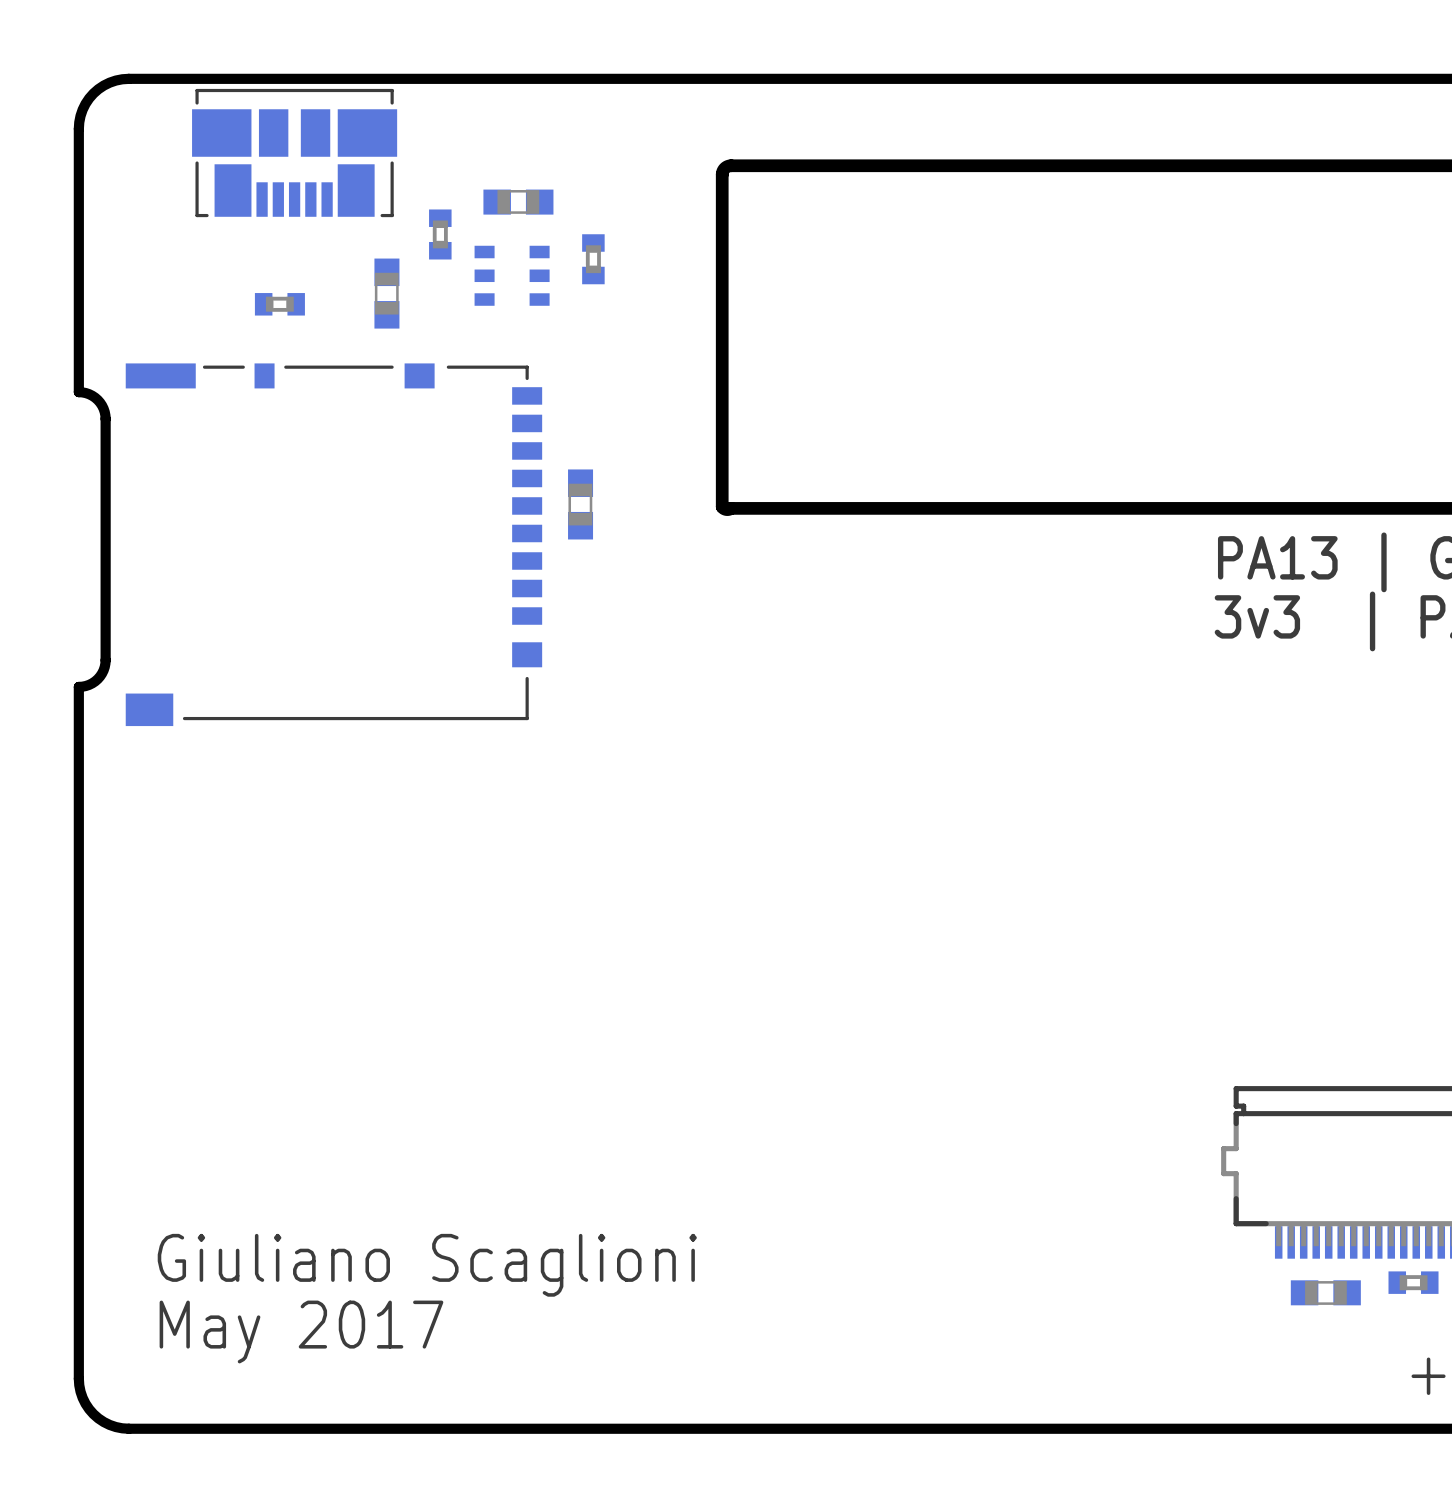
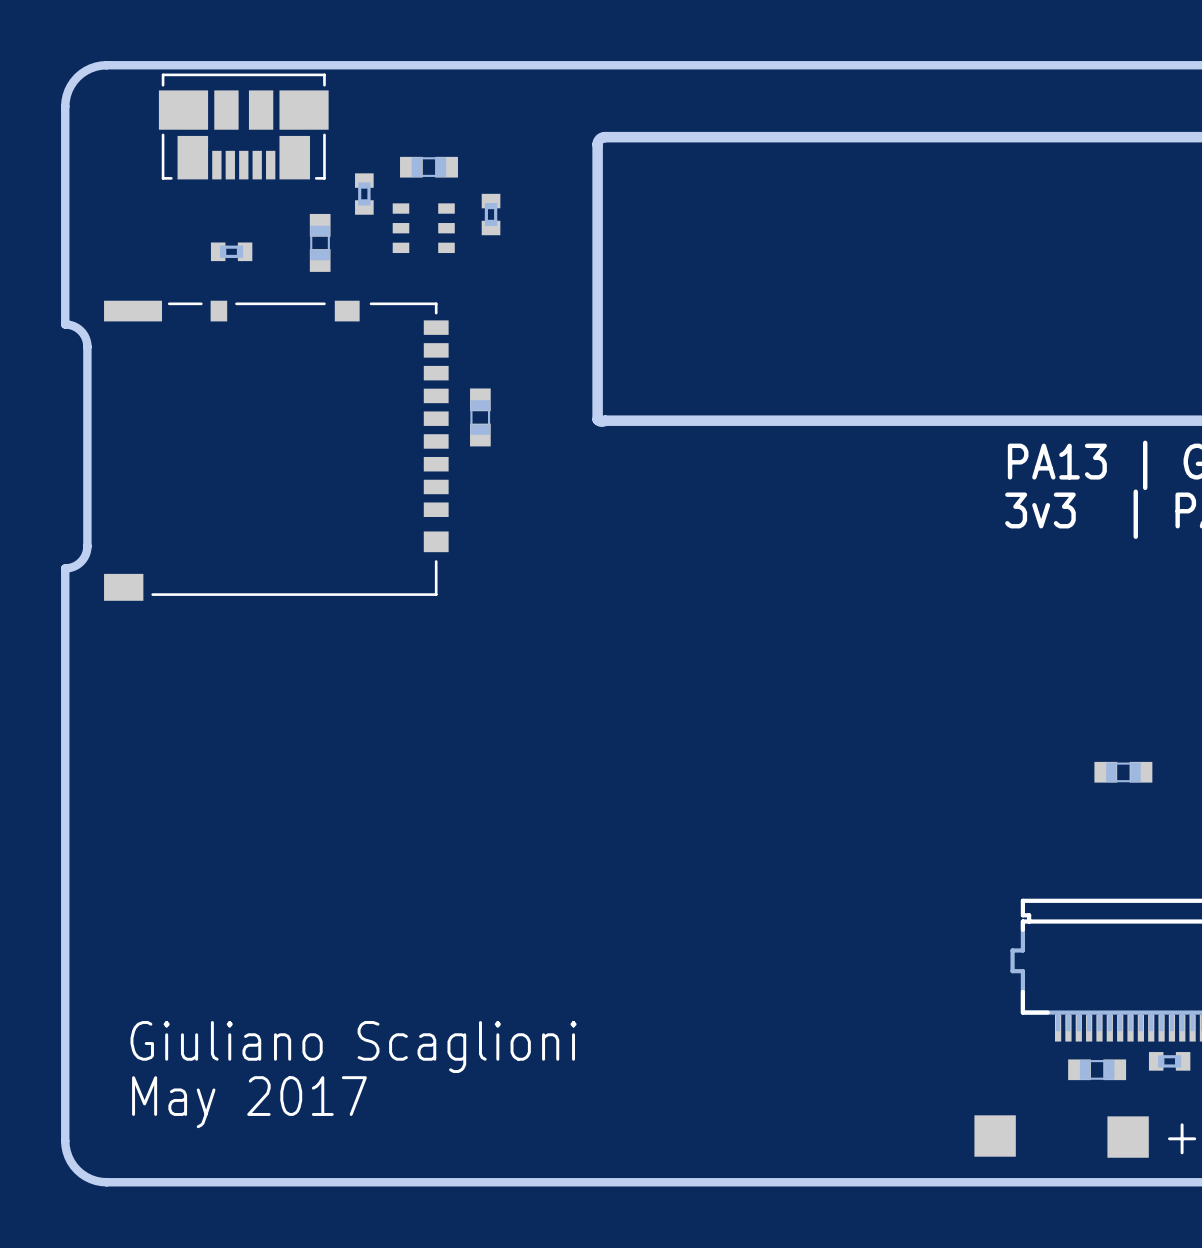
part: none -> (1123, 772)
part: none -> (995, 1136)
part: none -> (1128, 1137)

